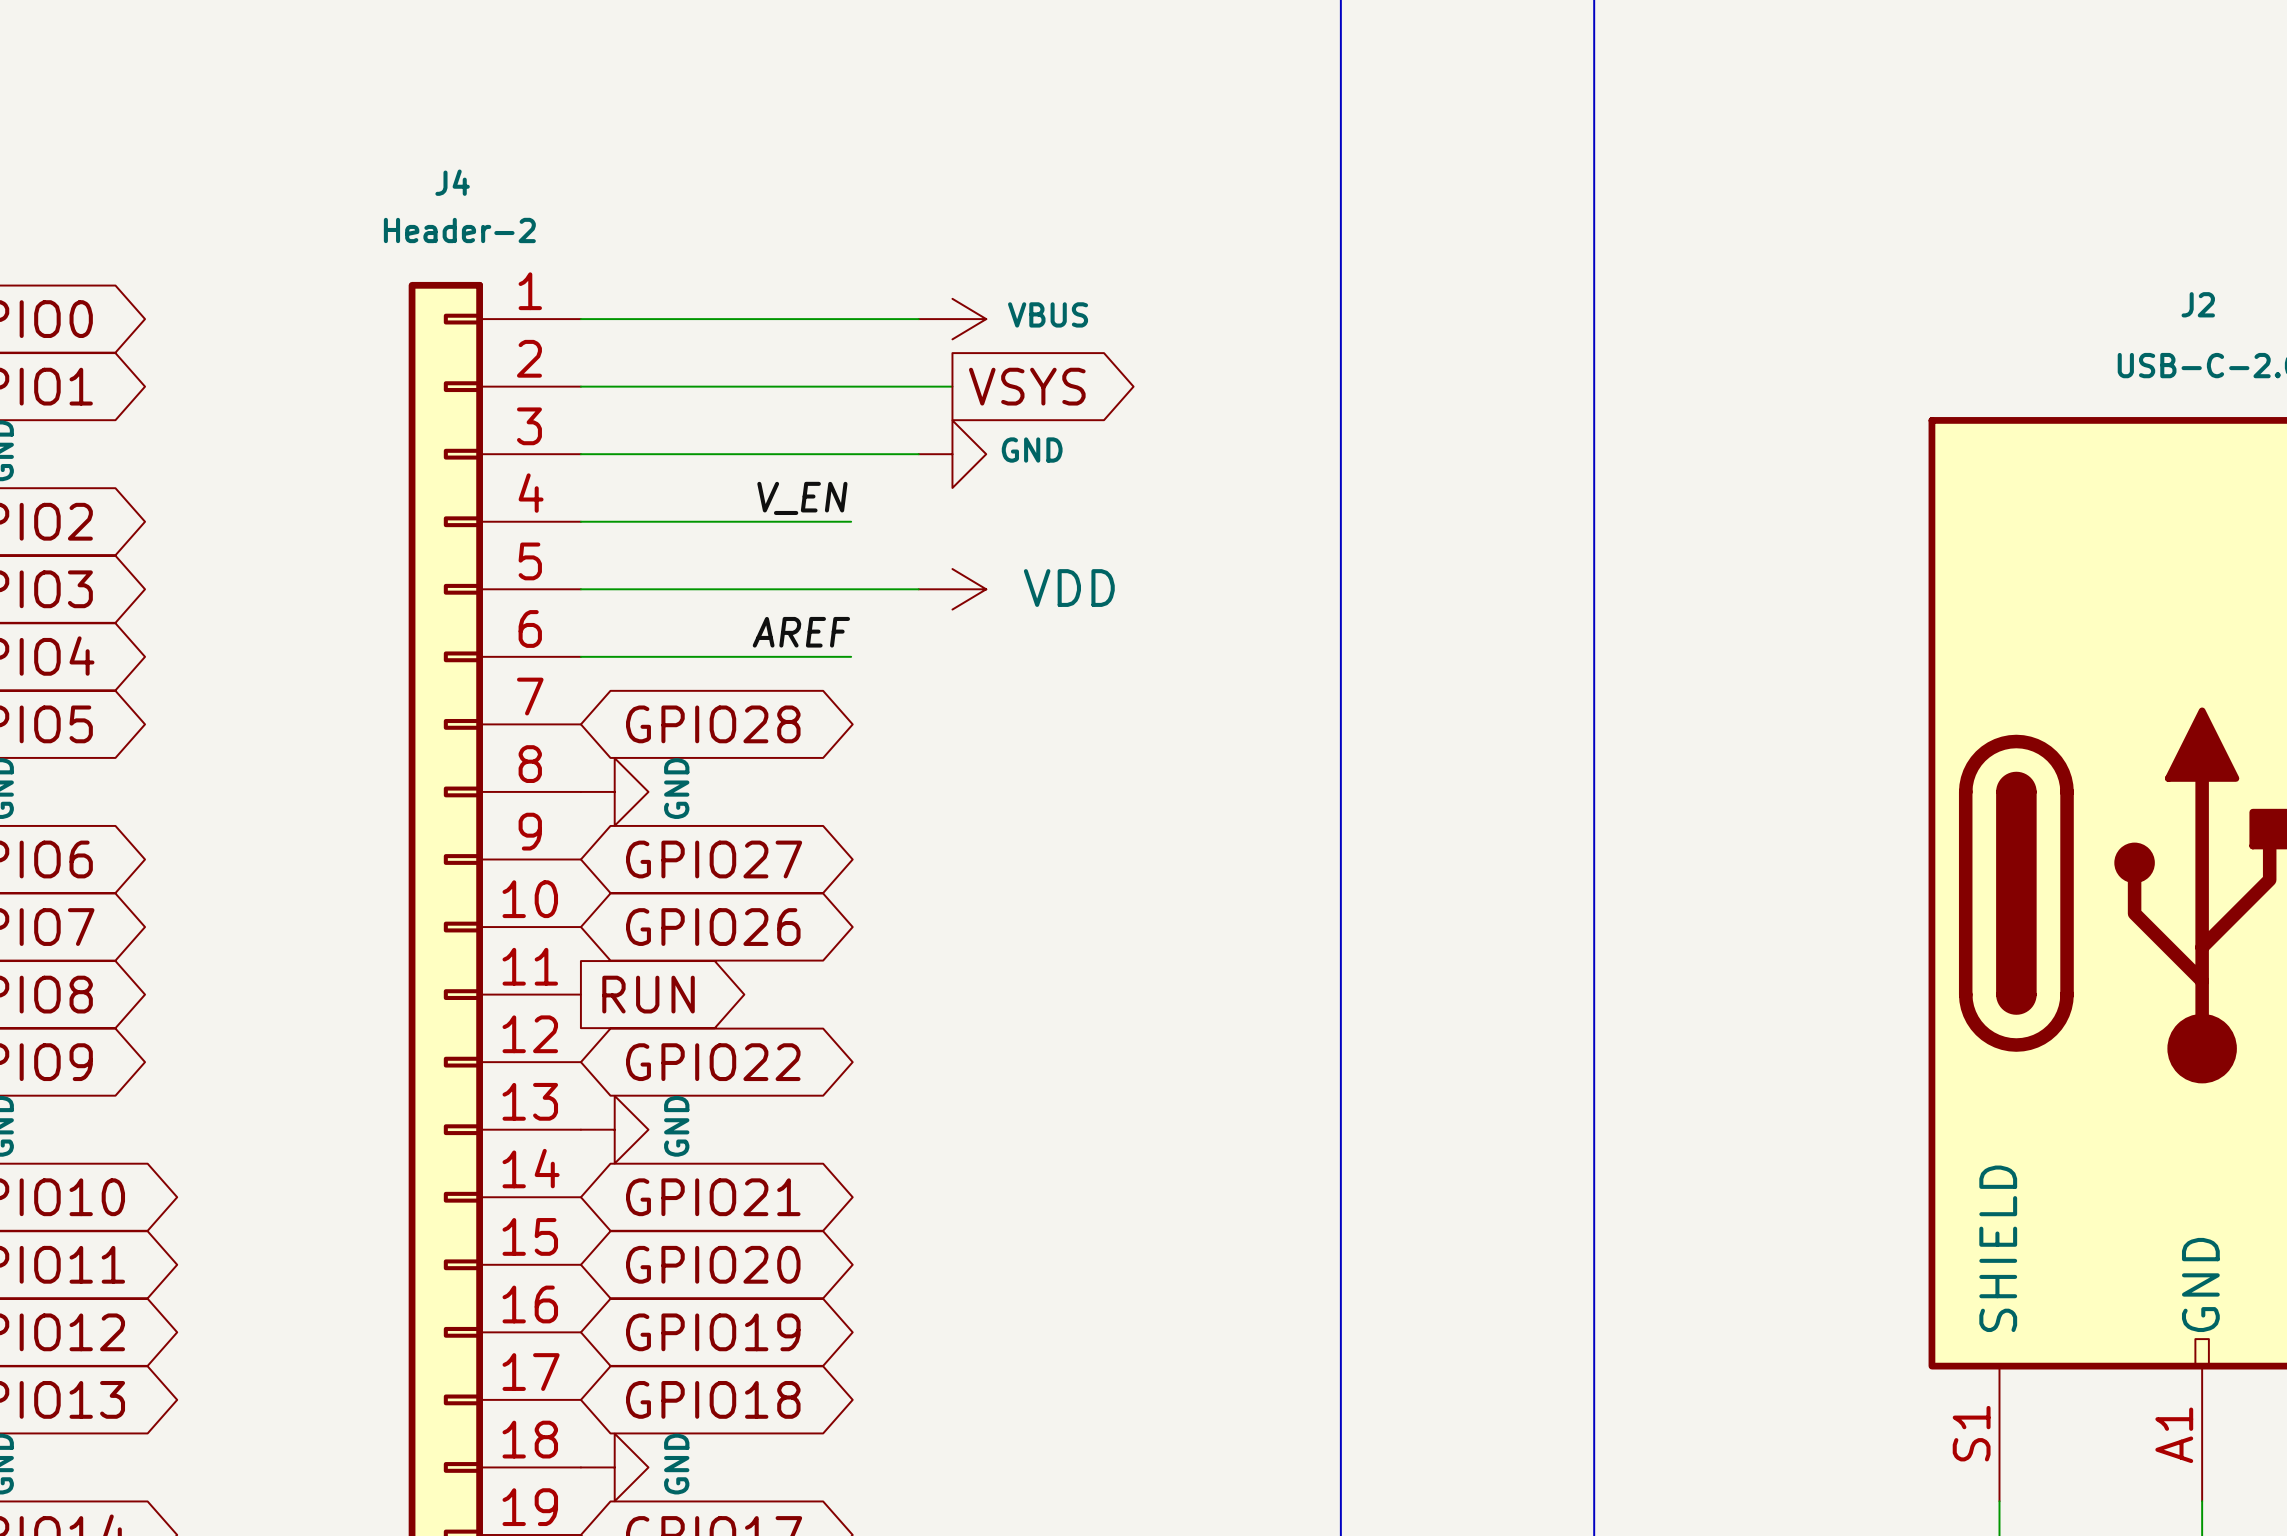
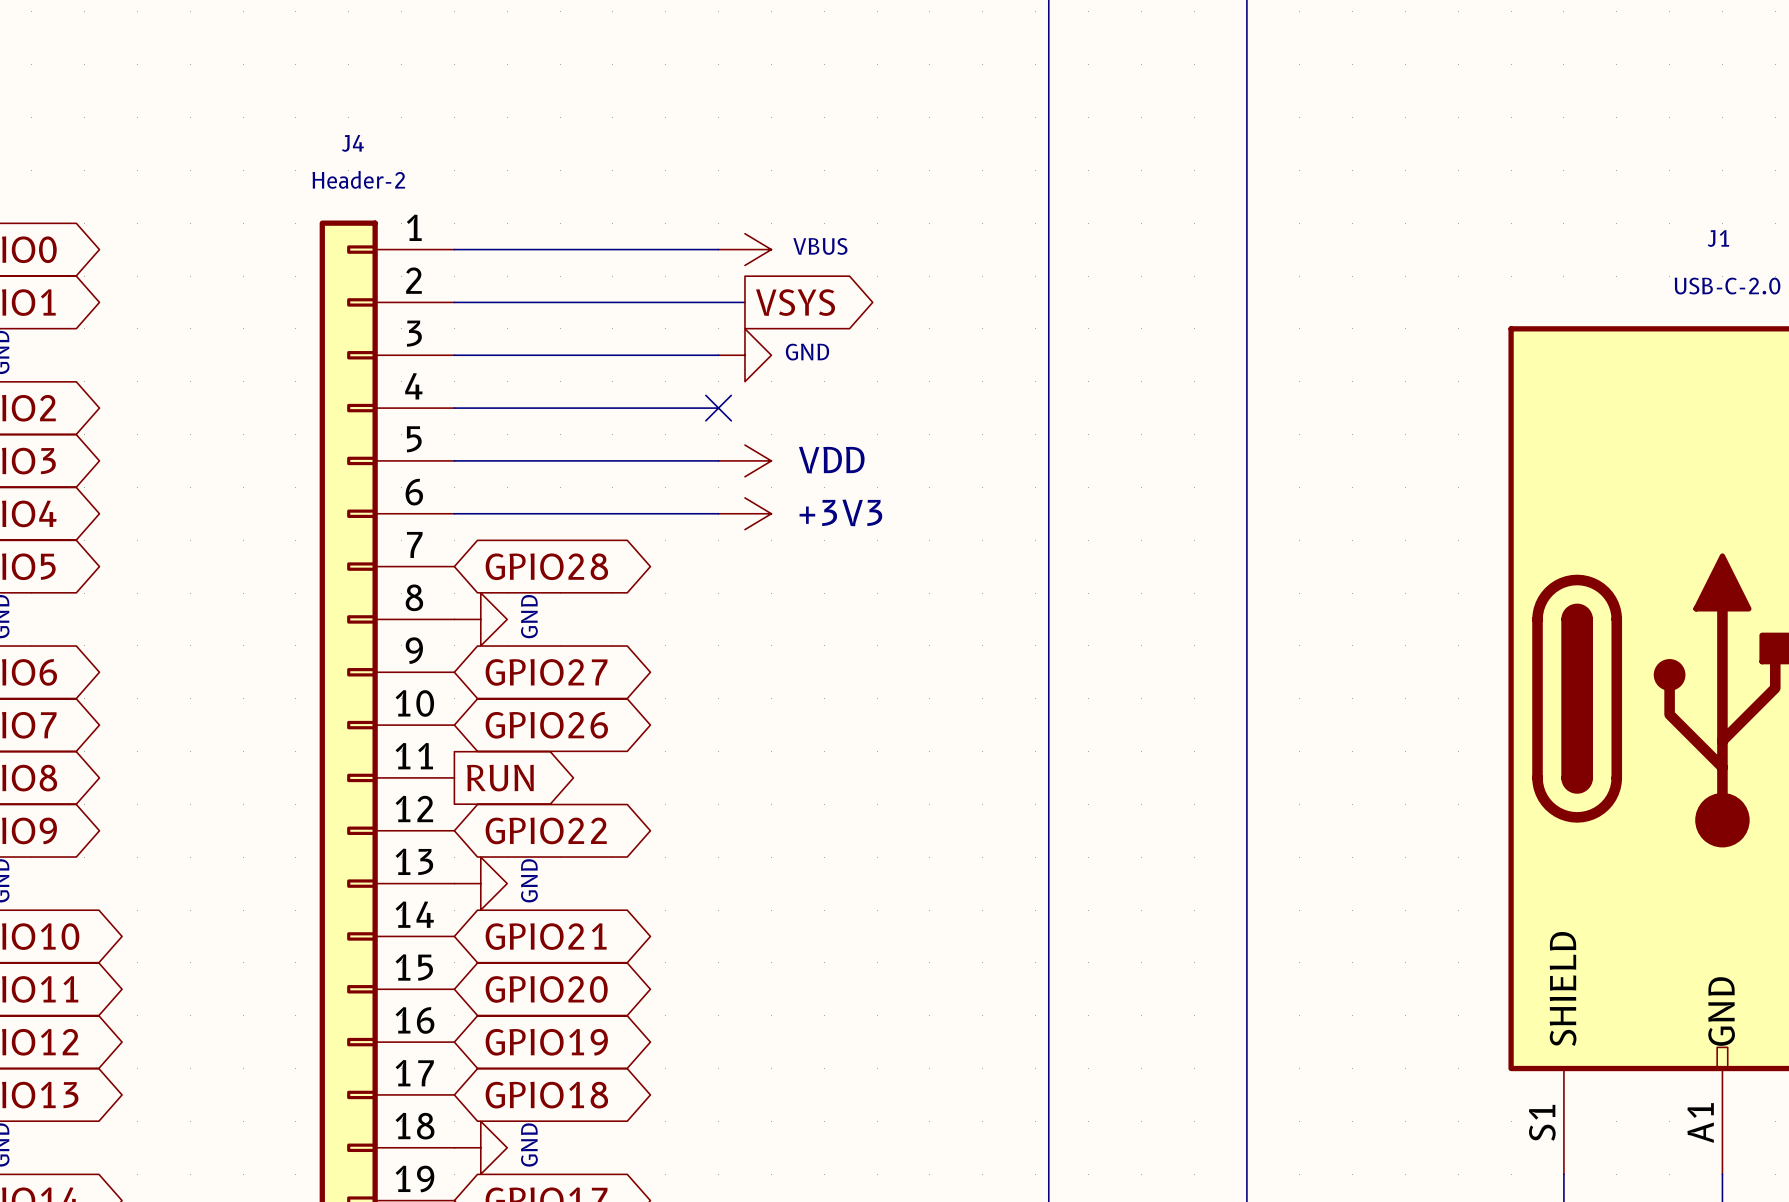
J2 name: J2 (2198, 304) -> J1 (1718, 238)
label: V_EN (802, 498) -> none
wire: none -> (665, 408) (718, 408)
no-connect mark: none -> (718, 408)
label: AREF (801, 632) -> none
wire: none -> (665, 513) (718, 513)
power symbol: none -> +3V3 (744, 513)

